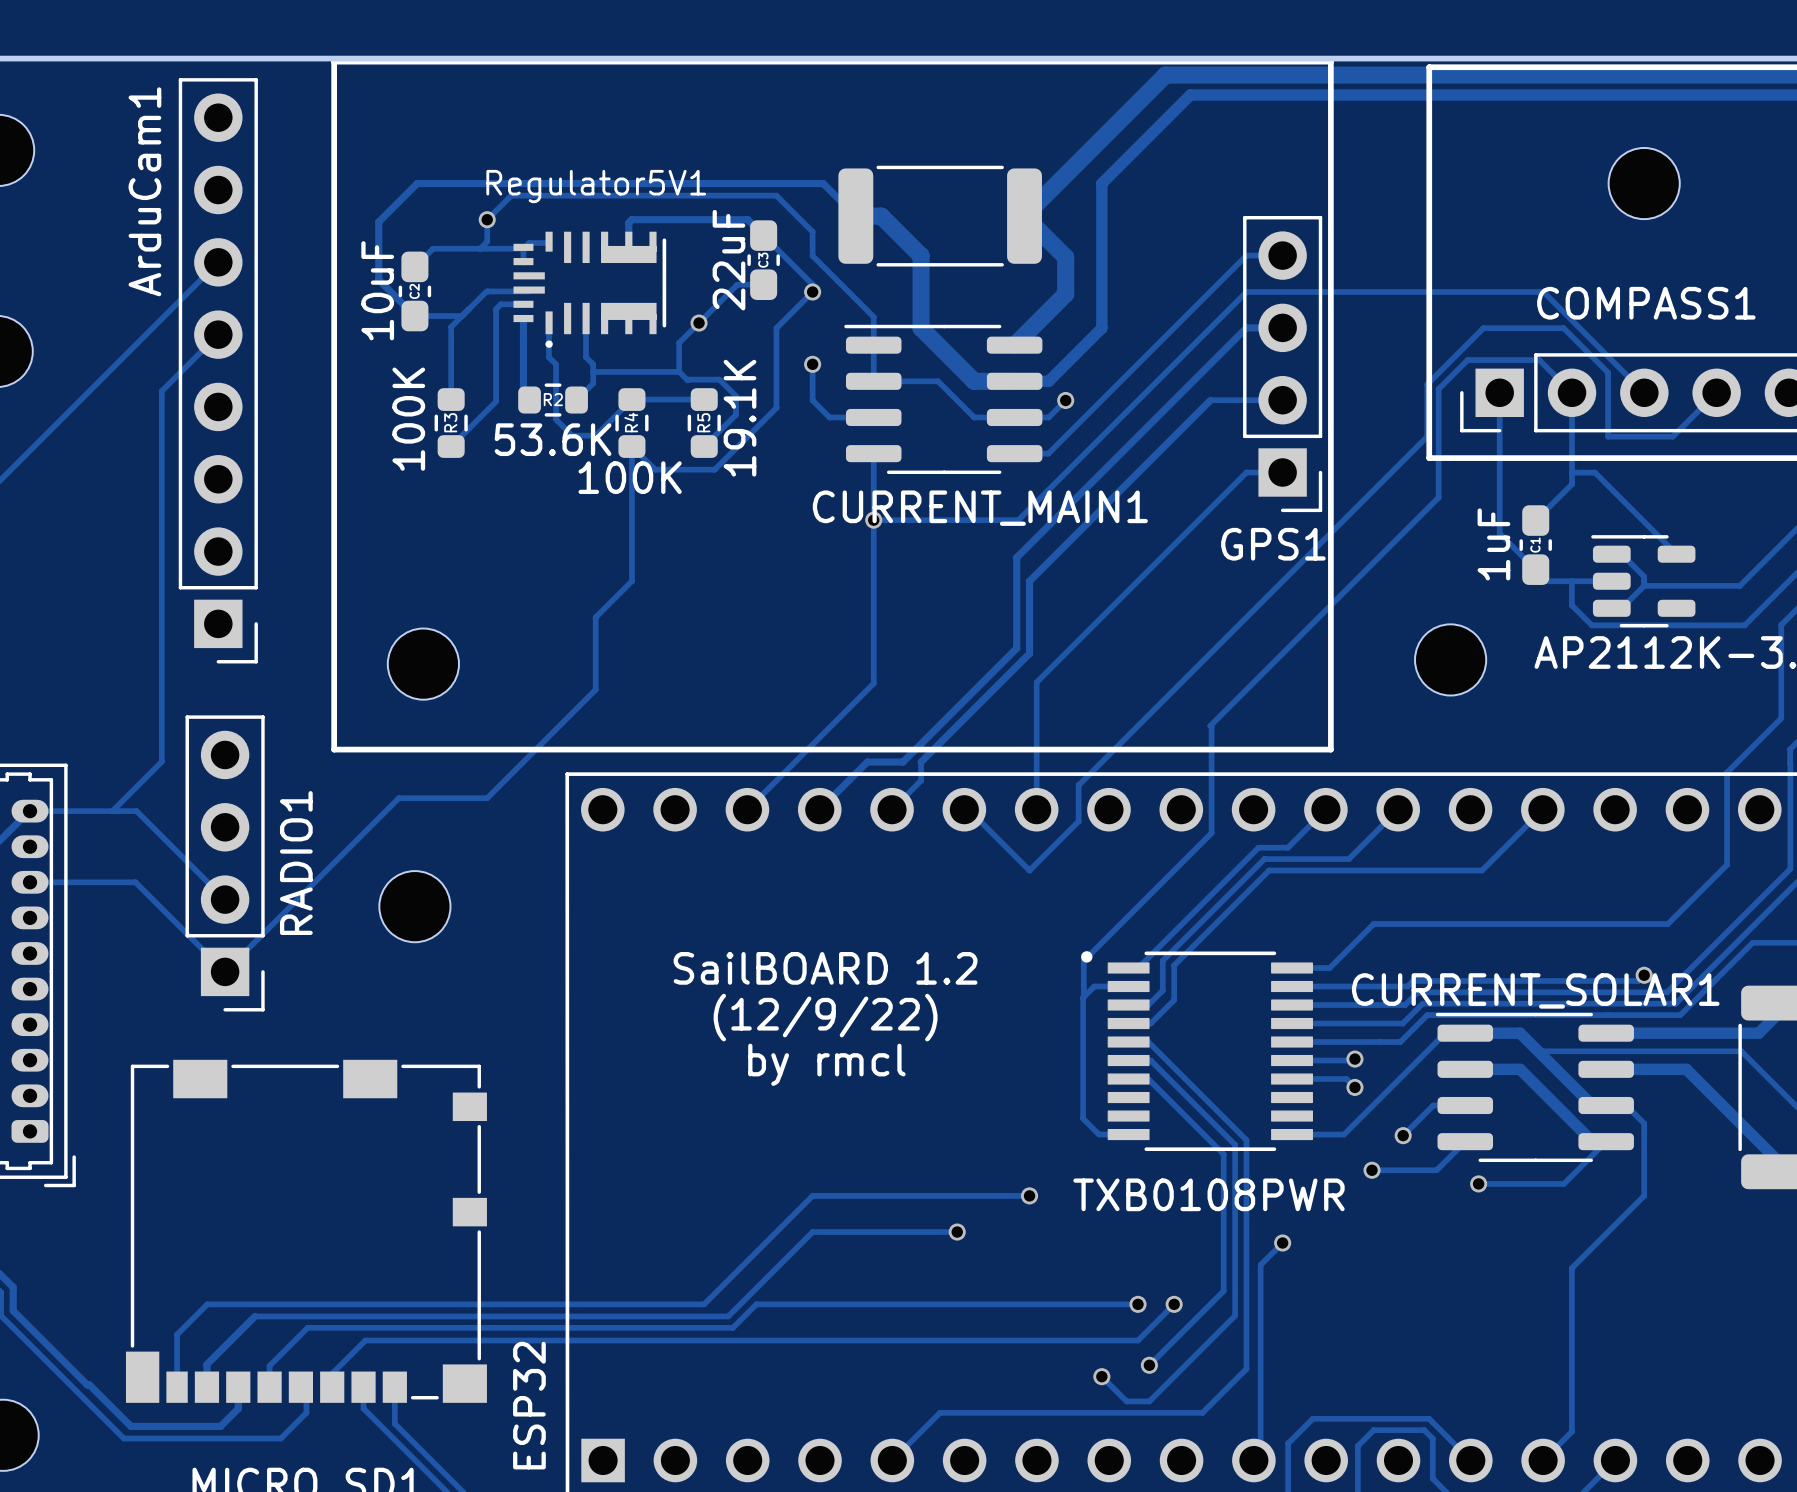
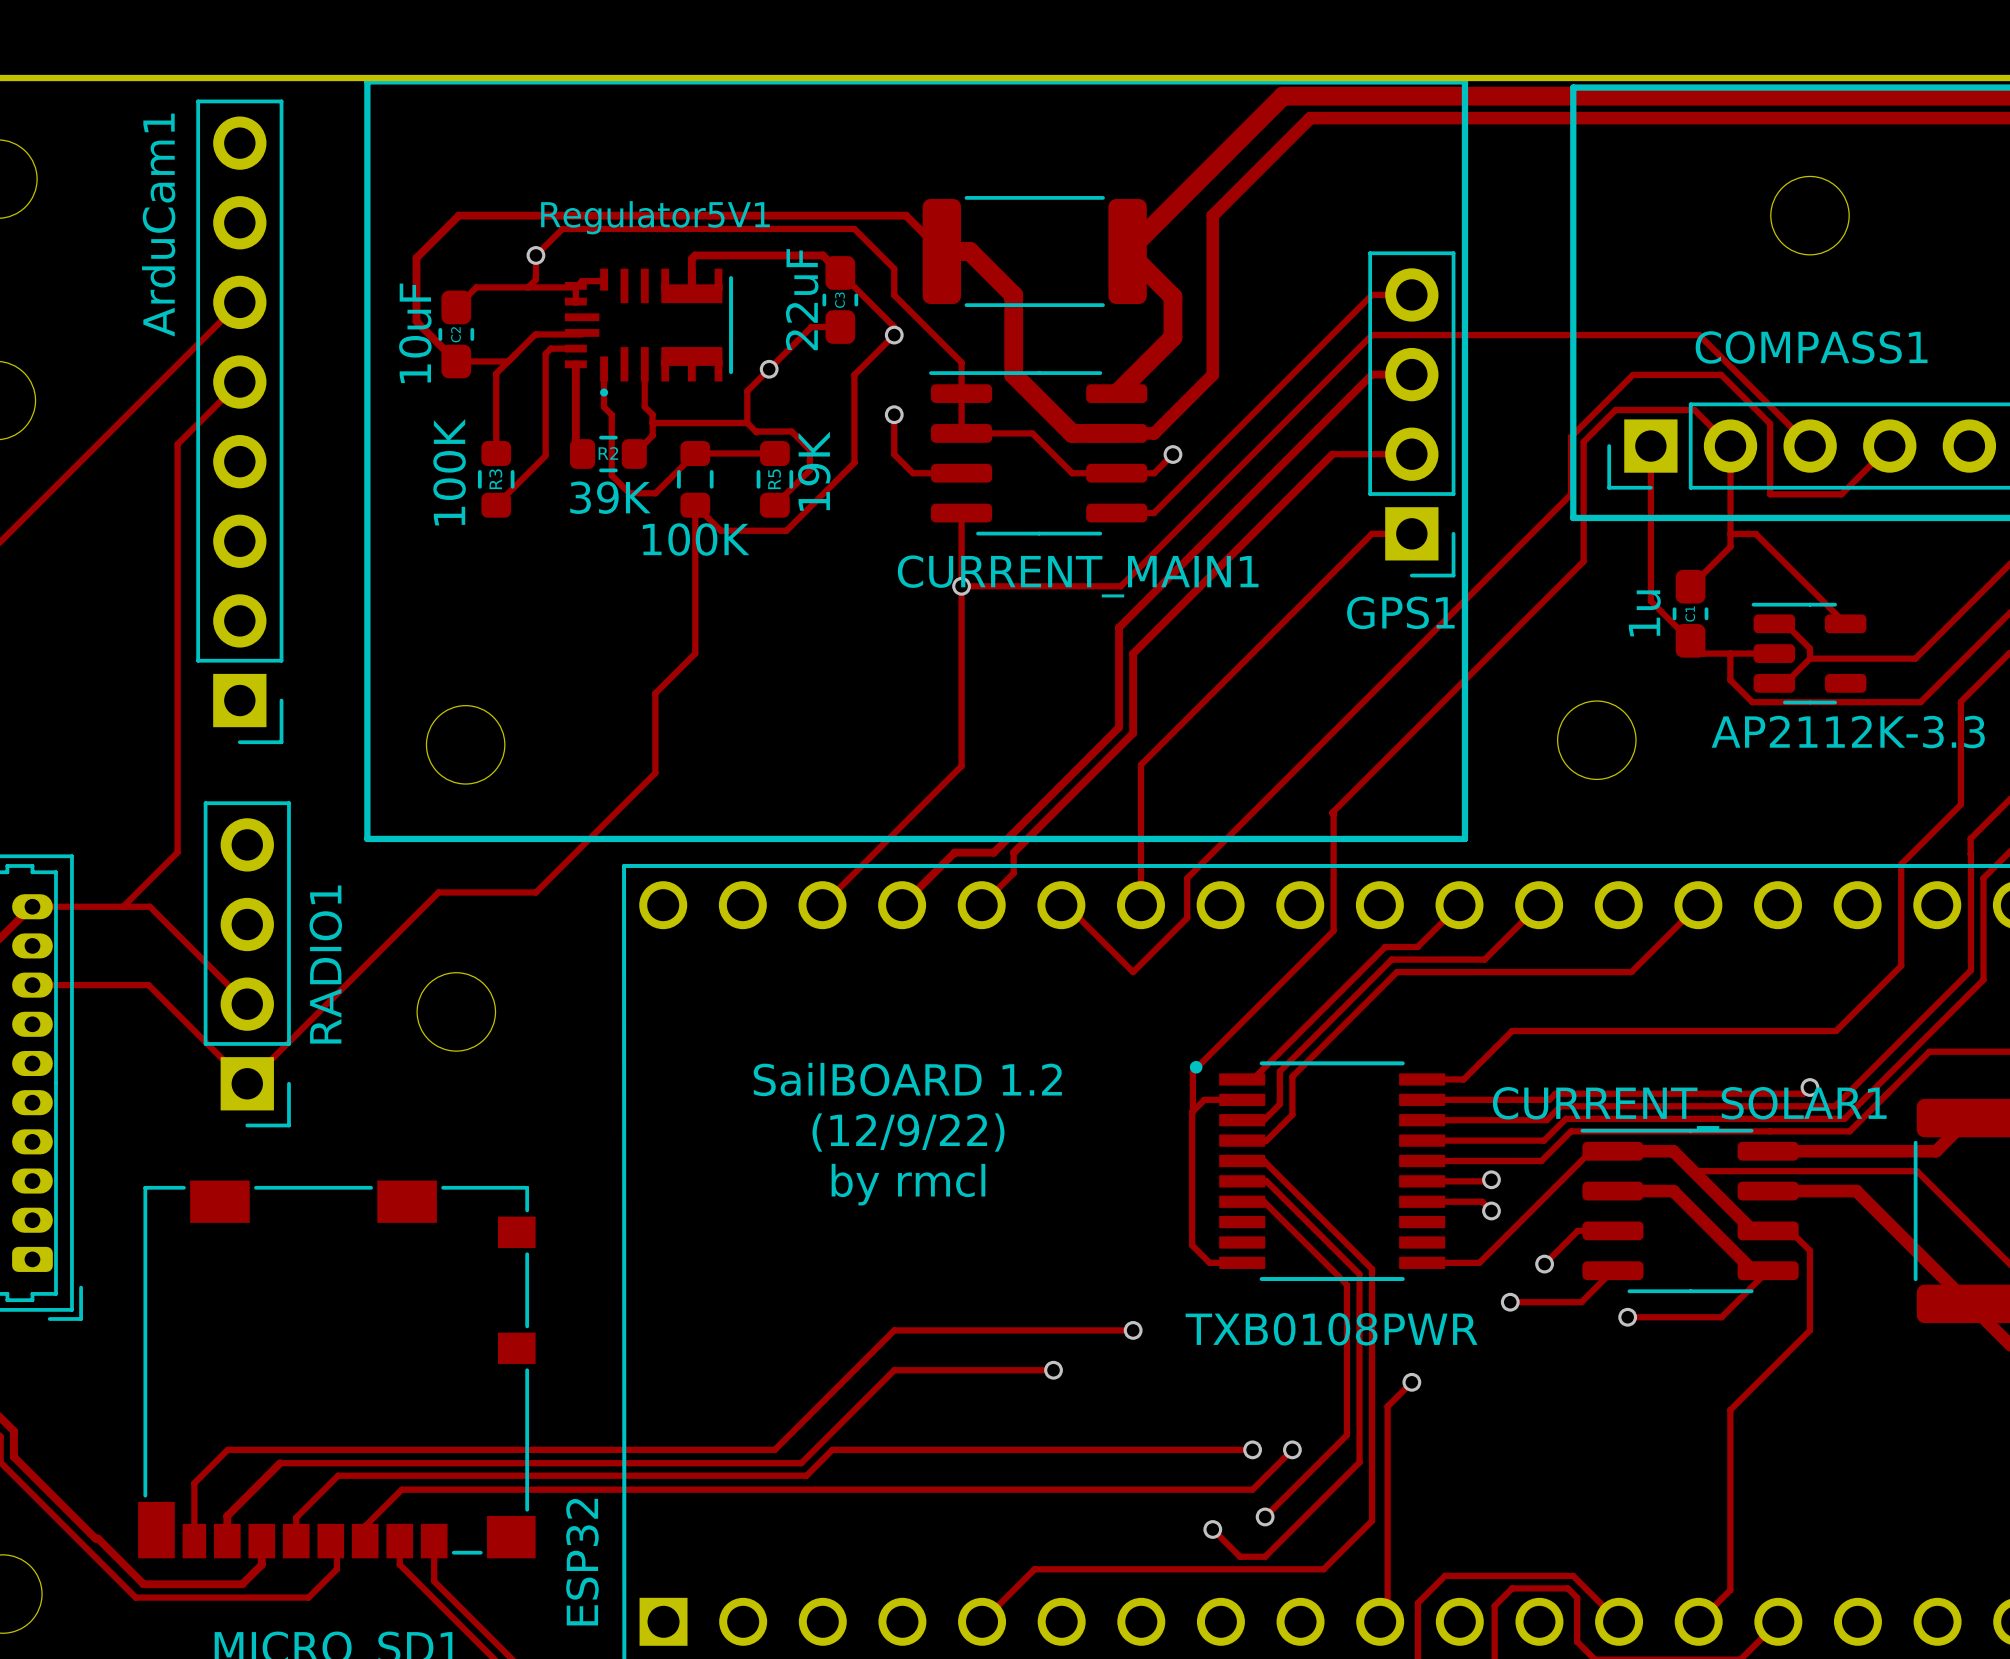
R5 value: 19.1K (739, 418) -> 19K (814, 471)
R4 name: R4 (631, 422) -> none
R2 value: 53.6K (553, 439) -> 39K (610, 497)
C1 value: 1uF (1493, 544) -> 1u (1644, 613)

